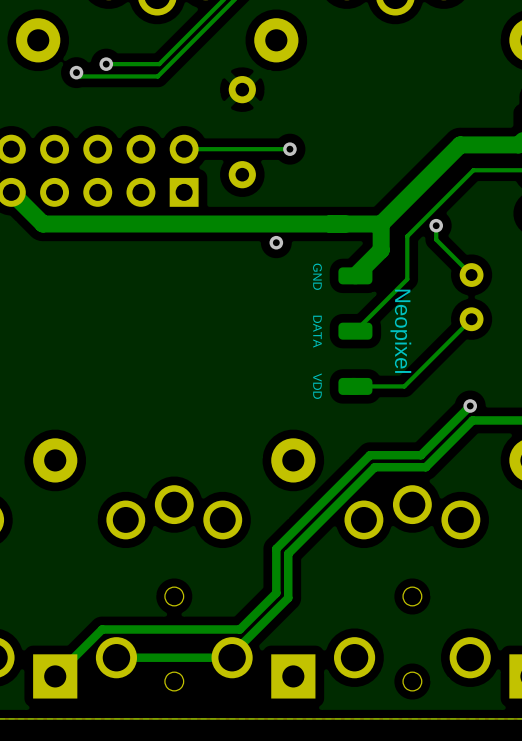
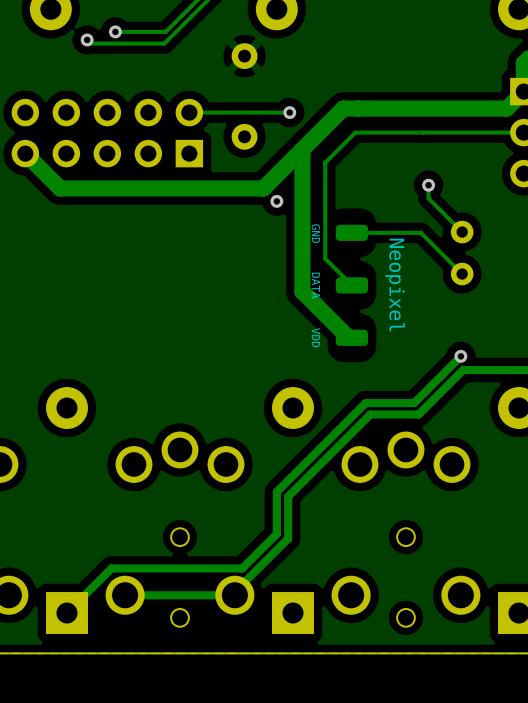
track: (460, 144) (381, 224) -> none
track: (473, 170) (407, 236) (407, 279) (355, 331) -> (463, 132) (355, 132) (325, 162) (325, 258) (351, 285)
track: none -> (302, 149) (302, 291) (348, 337)
track: (381, 224) (42, 224) -> (451, 108) (343, 108) (263, 188) (60, 188) (55, 183)
track: (381, 224) (381, 250) (355, 275) -> none
track: (471, 319) (404, 386) (355, 386) -> (462, 274) (421, 232) (351, 232)

